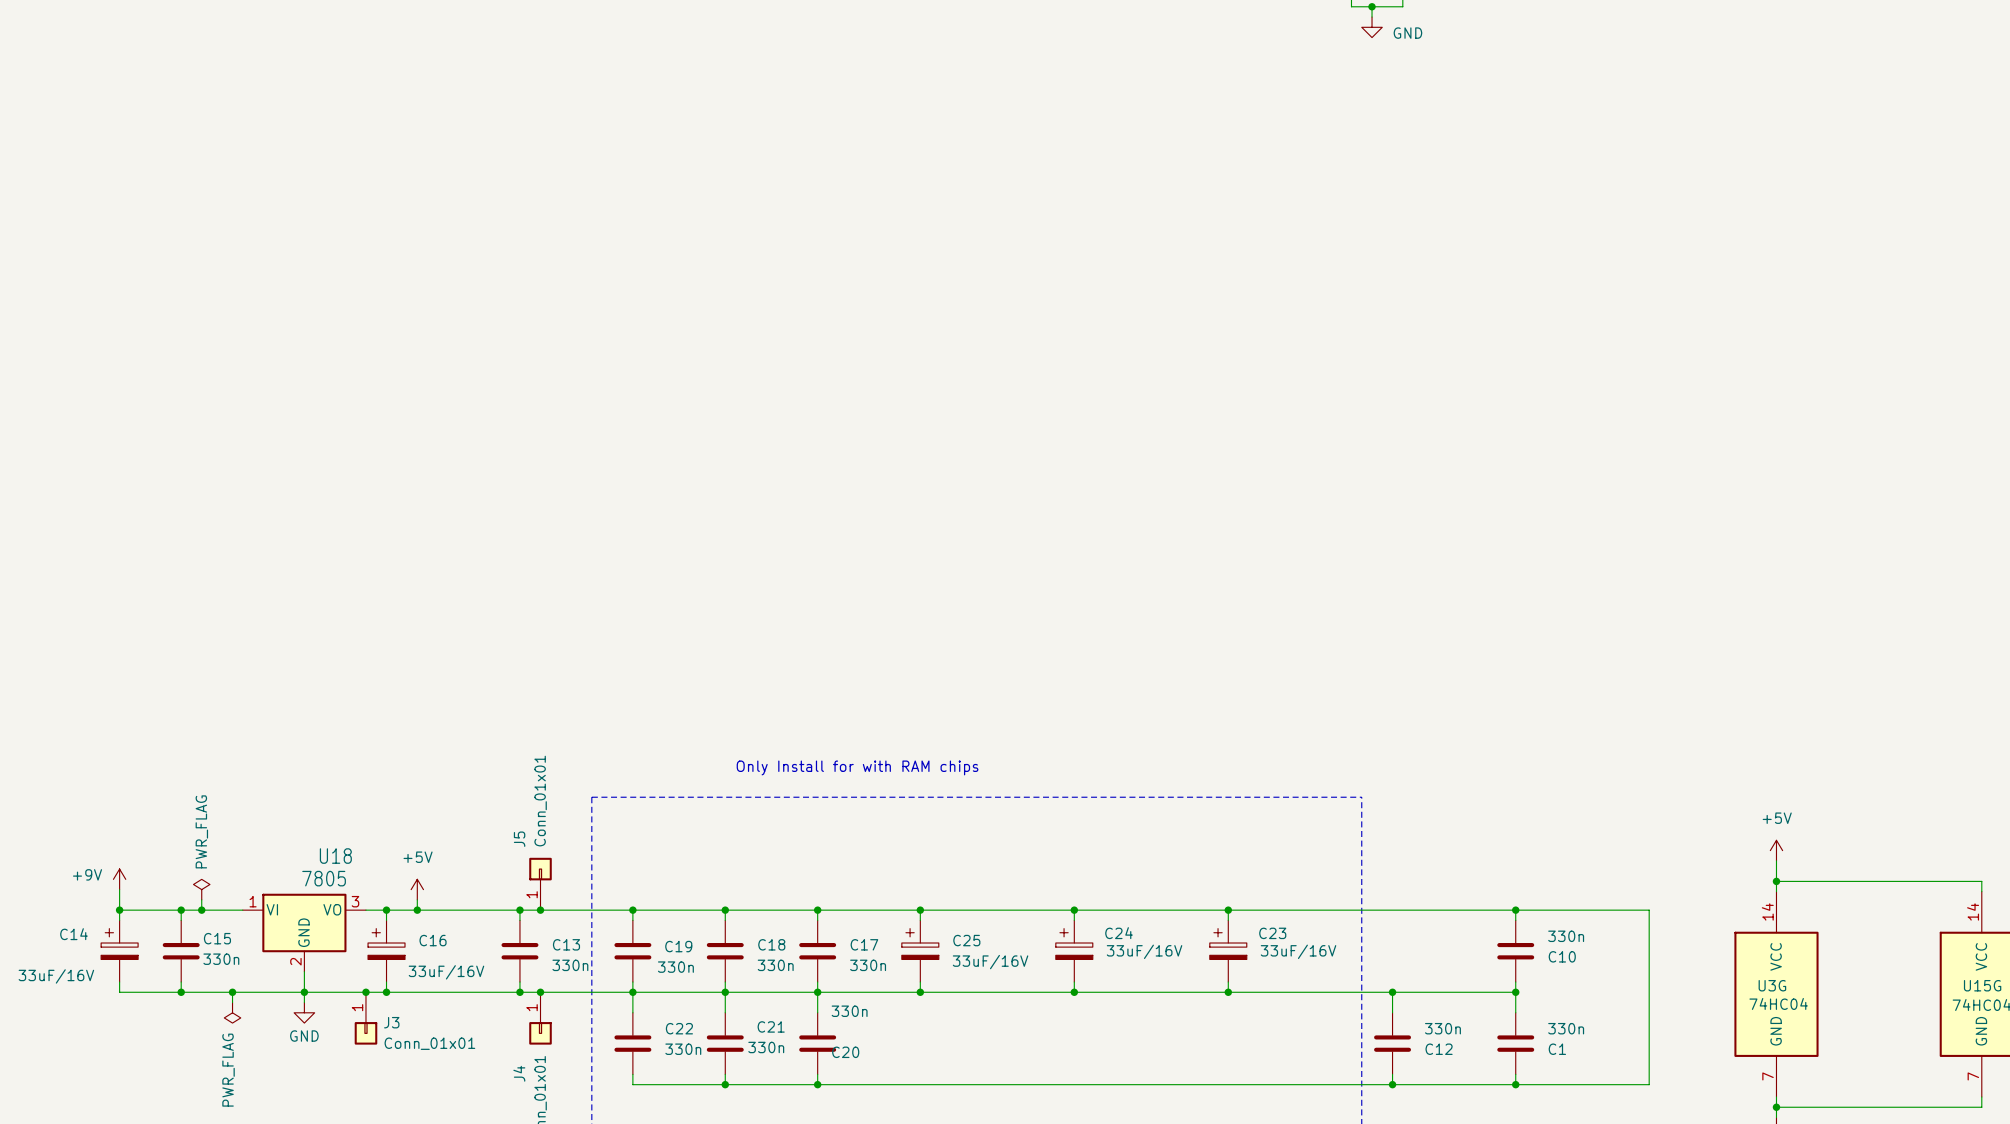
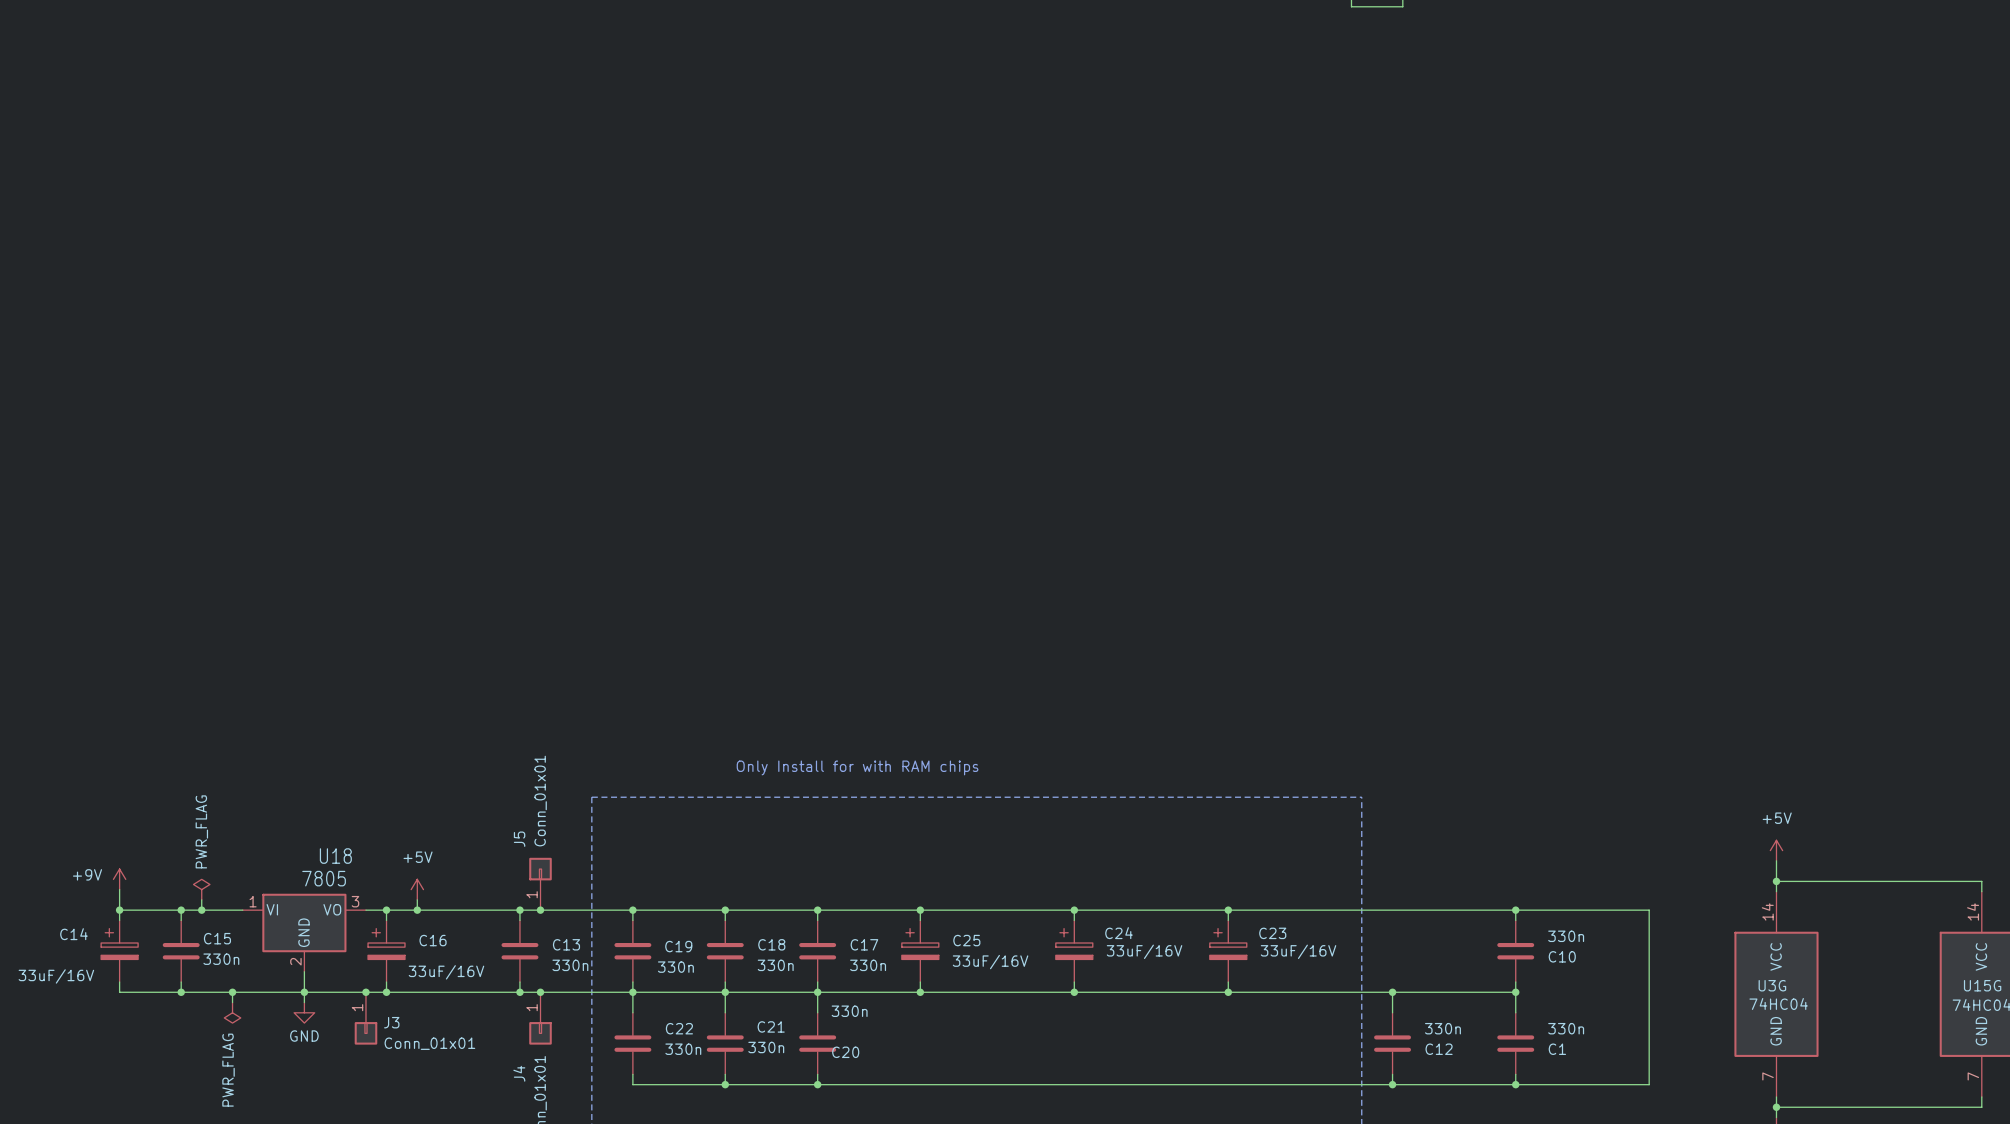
wire: (1372, 6) (1372, 17) -> none
junction: (1372, 6) -> none
power symbol: GND (1372, 27) -> none

